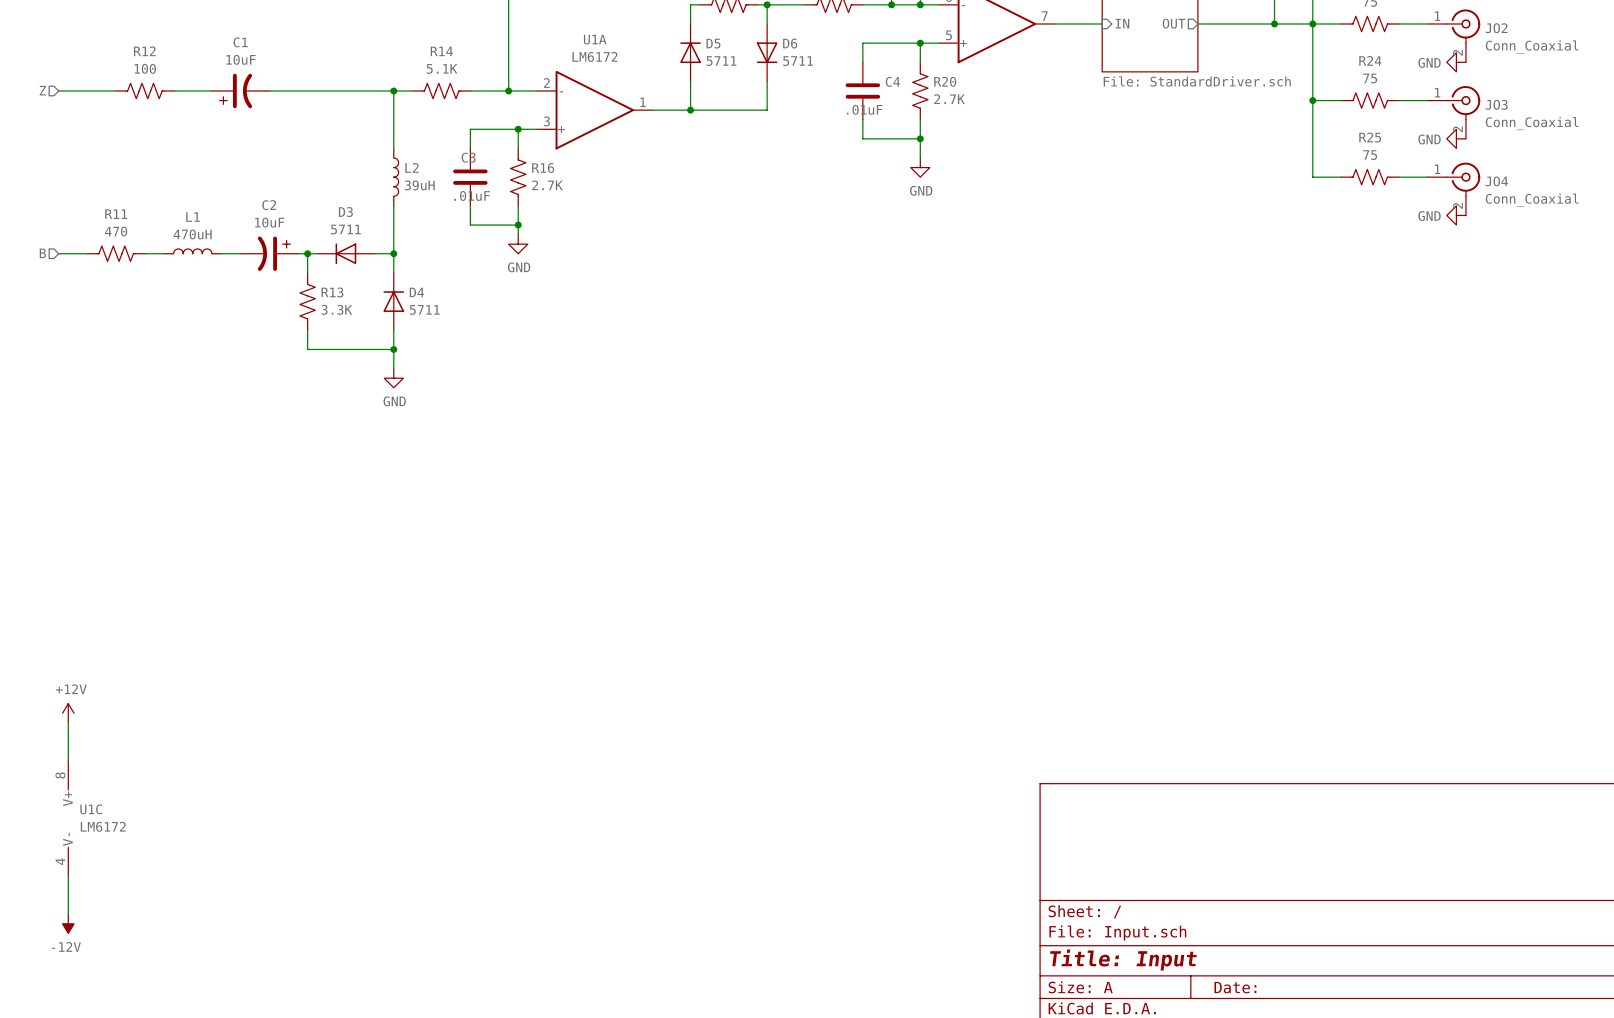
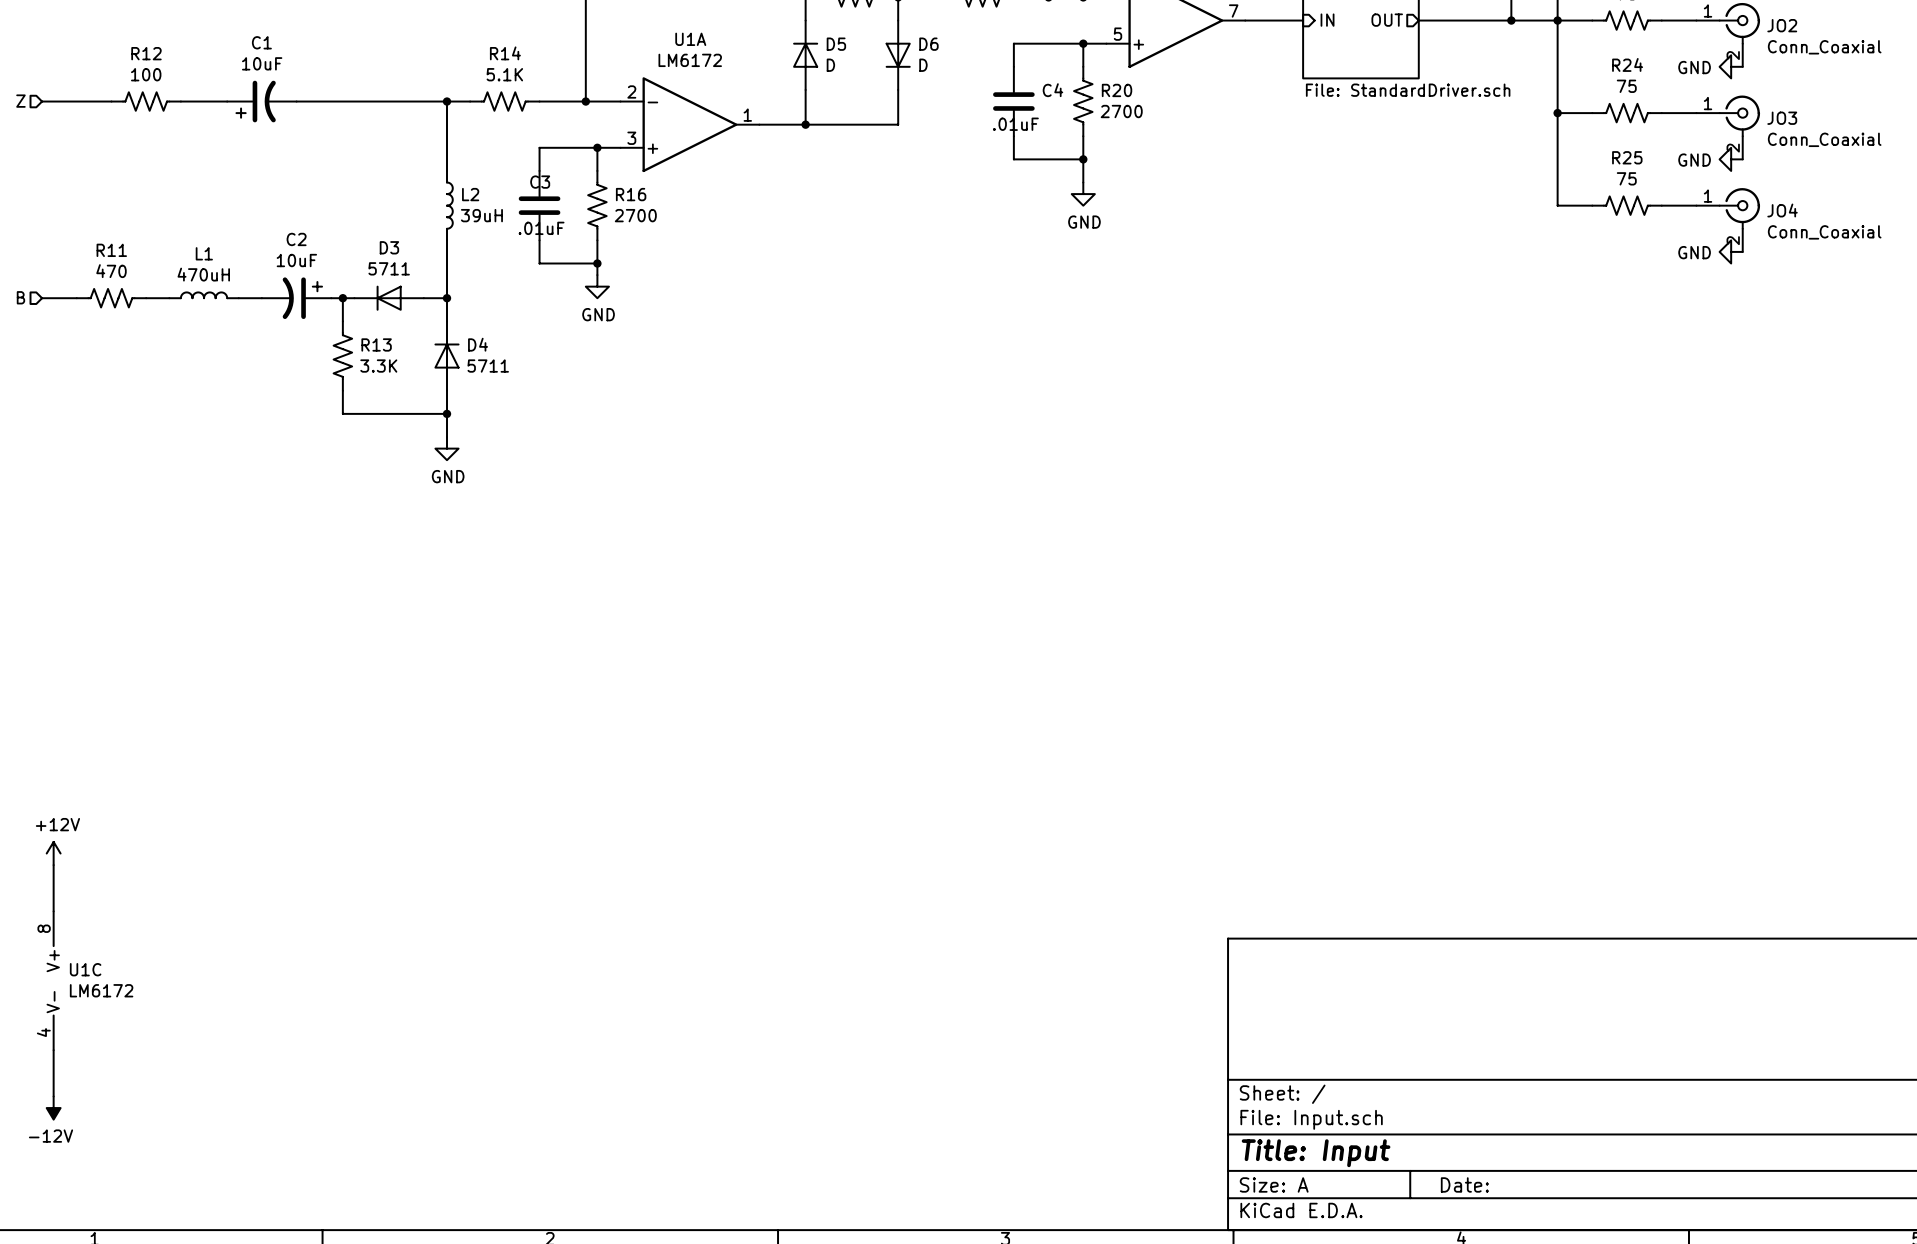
D5 value: 5711 (721, 61) -> D (830, 65)
D6 value: 5711 (798, 61) -> D (923, 65)
R20 value: 2.7K (949, 99) -> 2700 (1121, 111)
R16 value: 2.7K (547, 185) -> 2700 (635, 215)

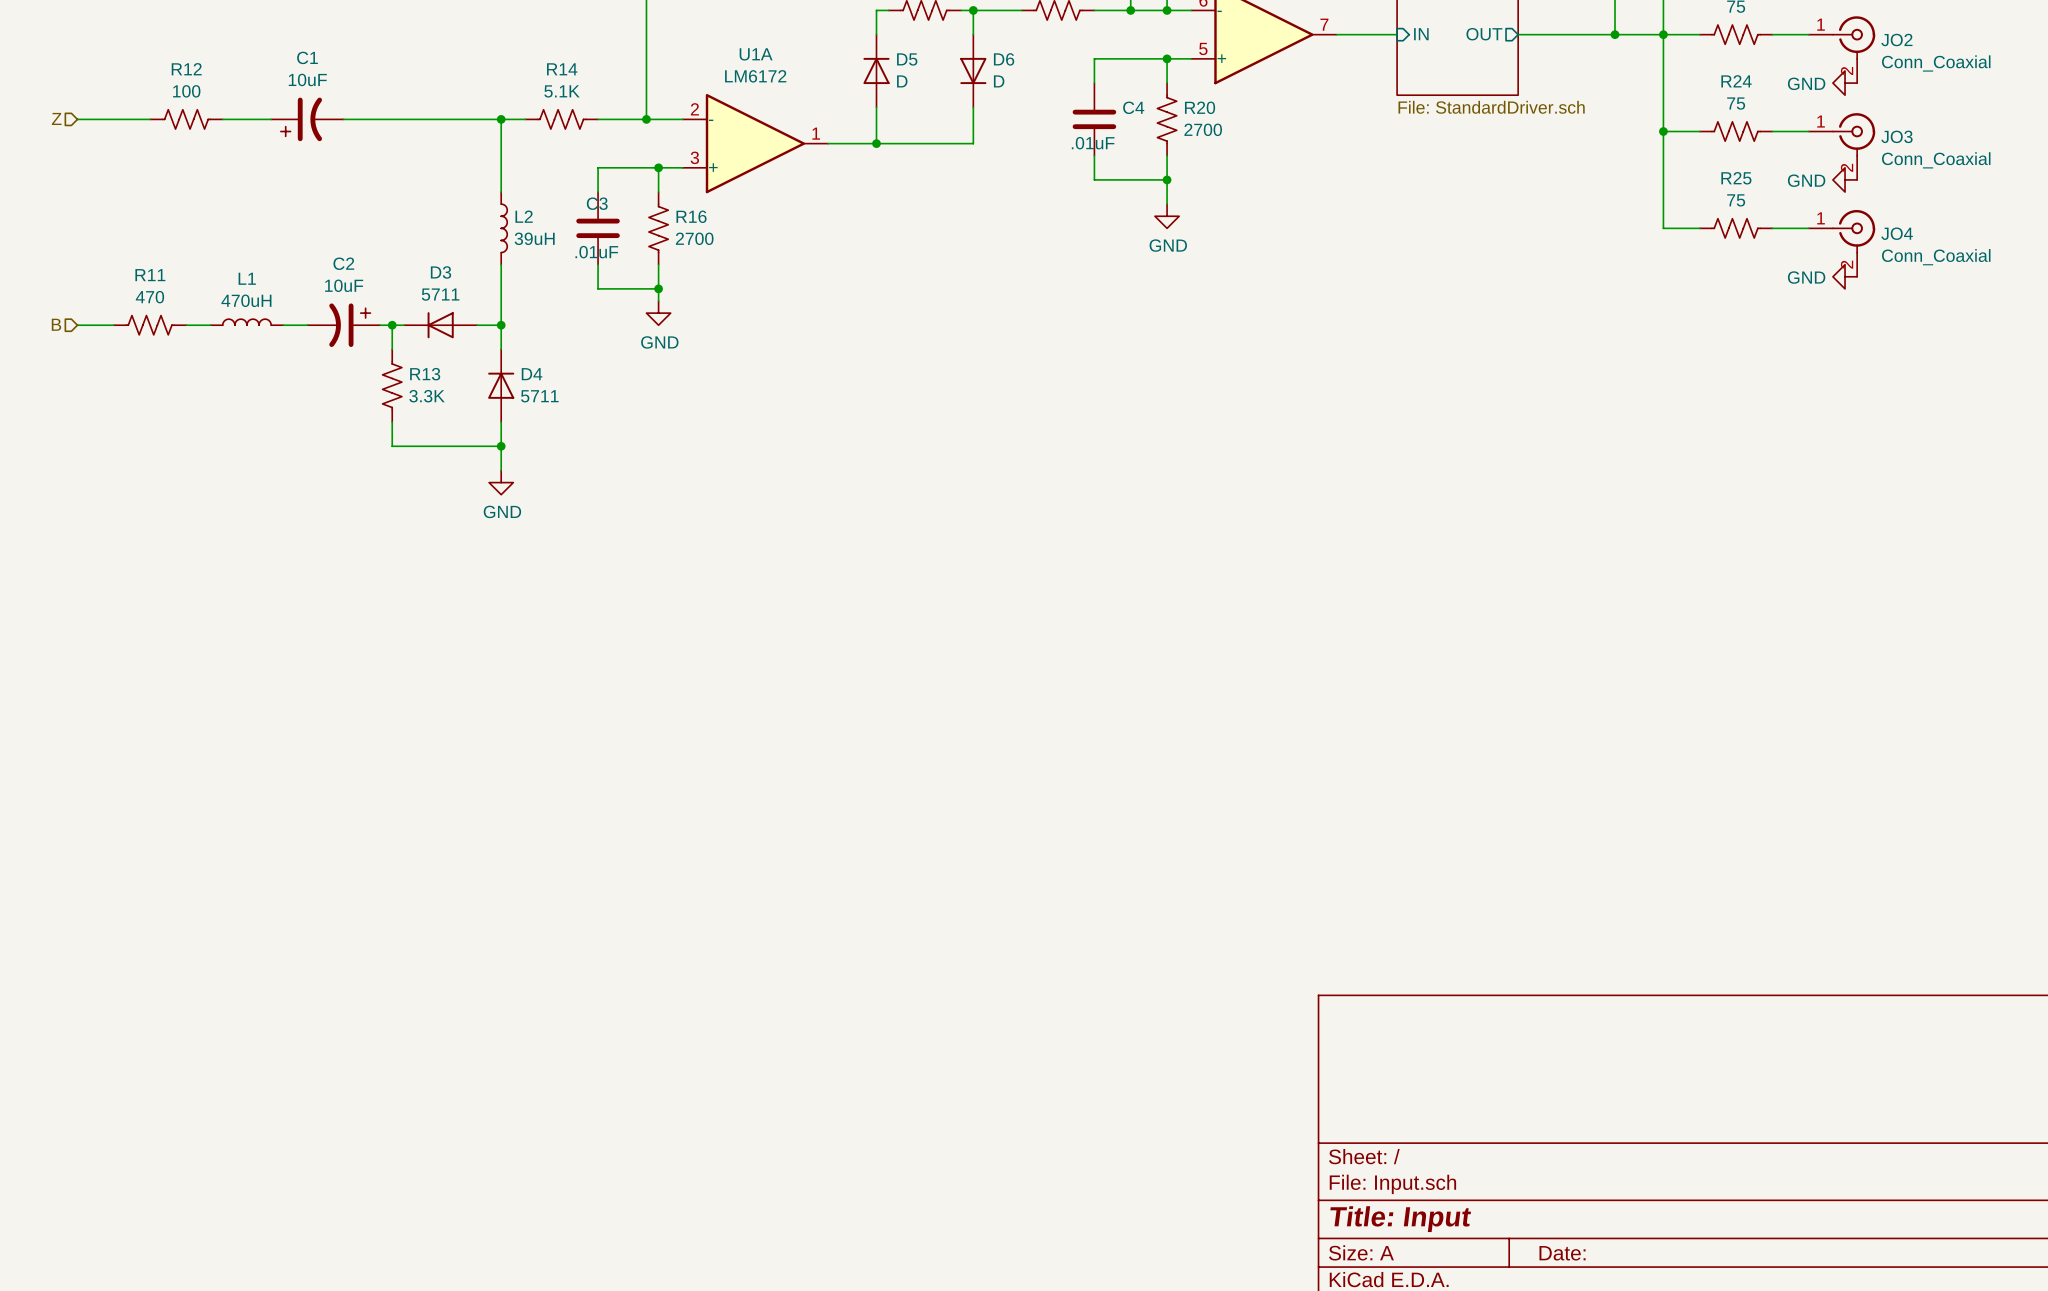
power symbol: +12V (53, 853) -> none
wire: (53, 865) (53, 911) -> none
U1C: LM6172 (53, 980) -> none
wire: (53, 1050) (53, 1096) -> none
power symbol: -12V (53, 1108) -> none

